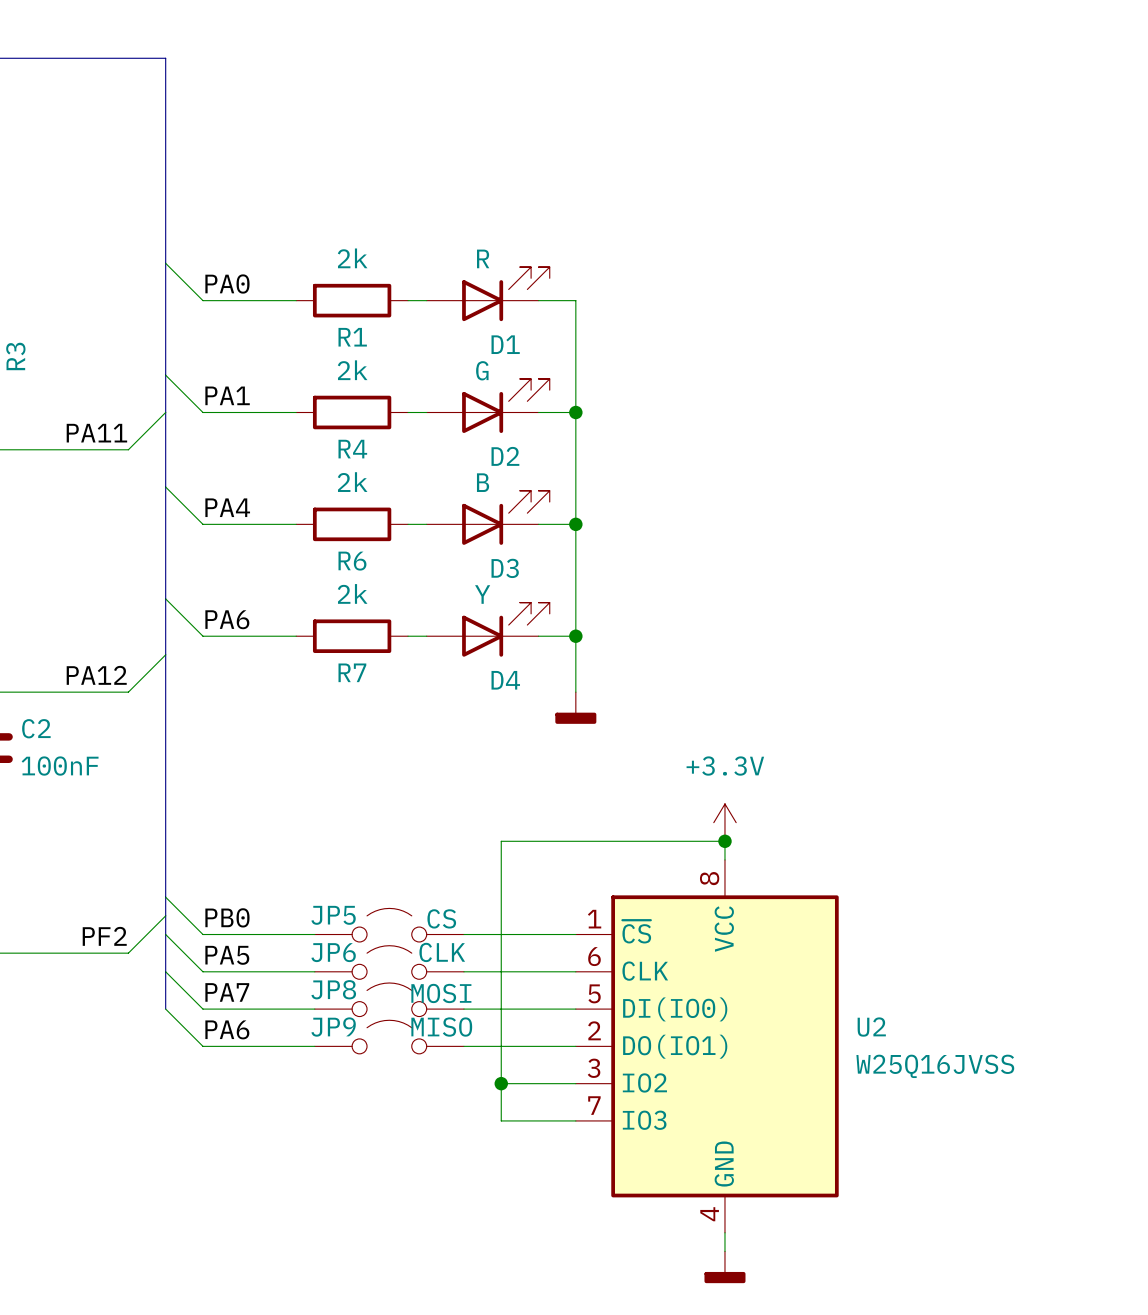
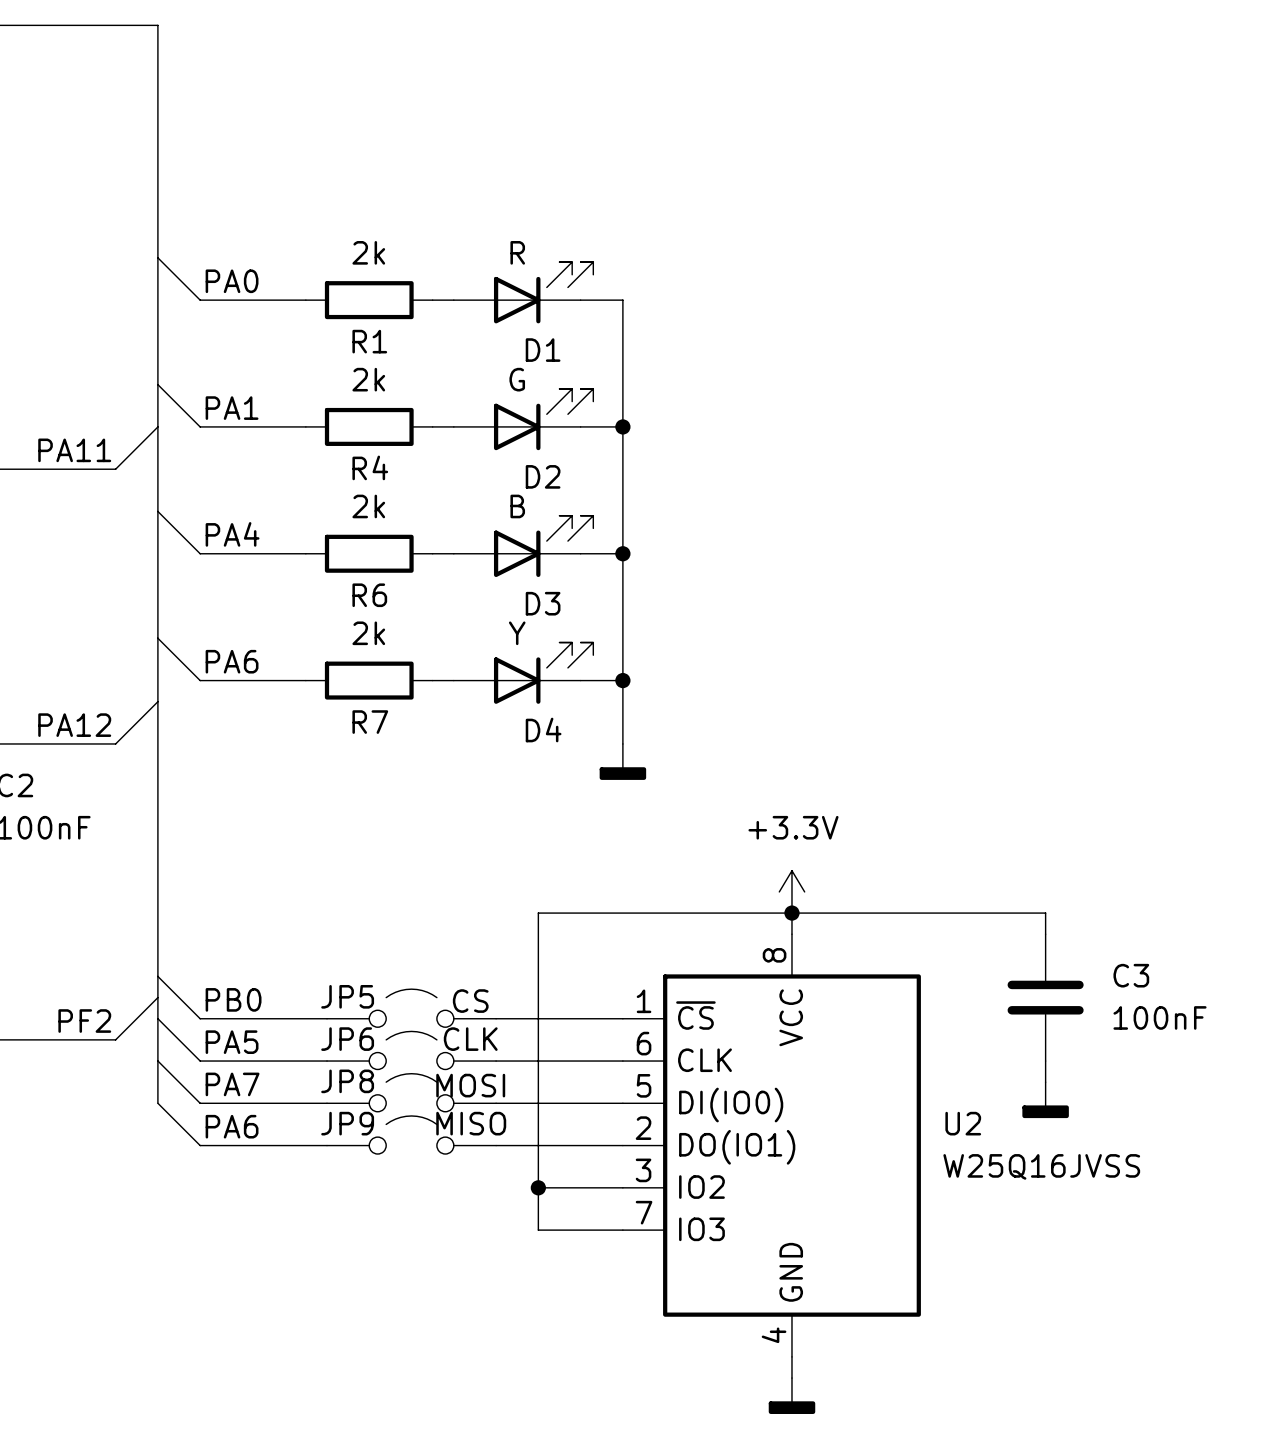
wire: none -> (791, 913) (1045, 913) (1045, 934)
C3: none -> 100nF (1045, 997)
wire: none -> (1045, 1061) (1045, 1082)
power symbol: none -> (1045, 1100)

